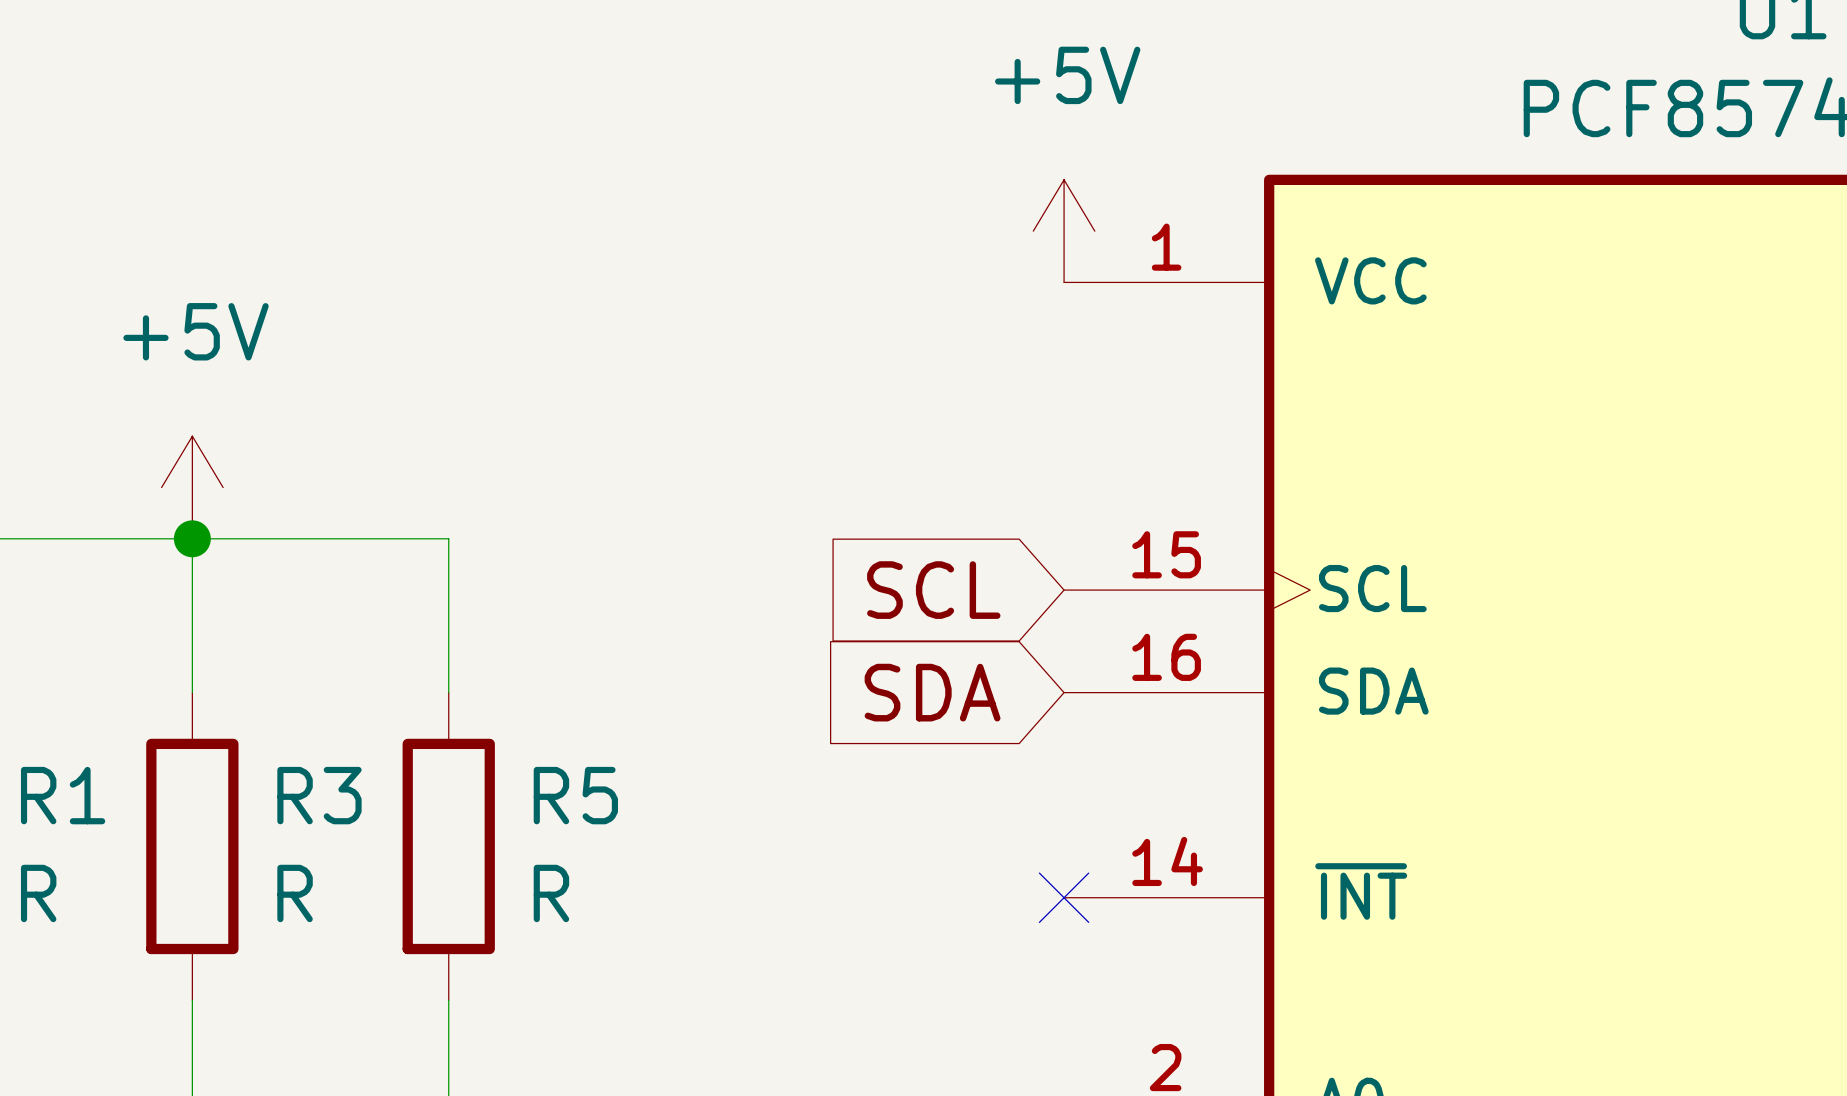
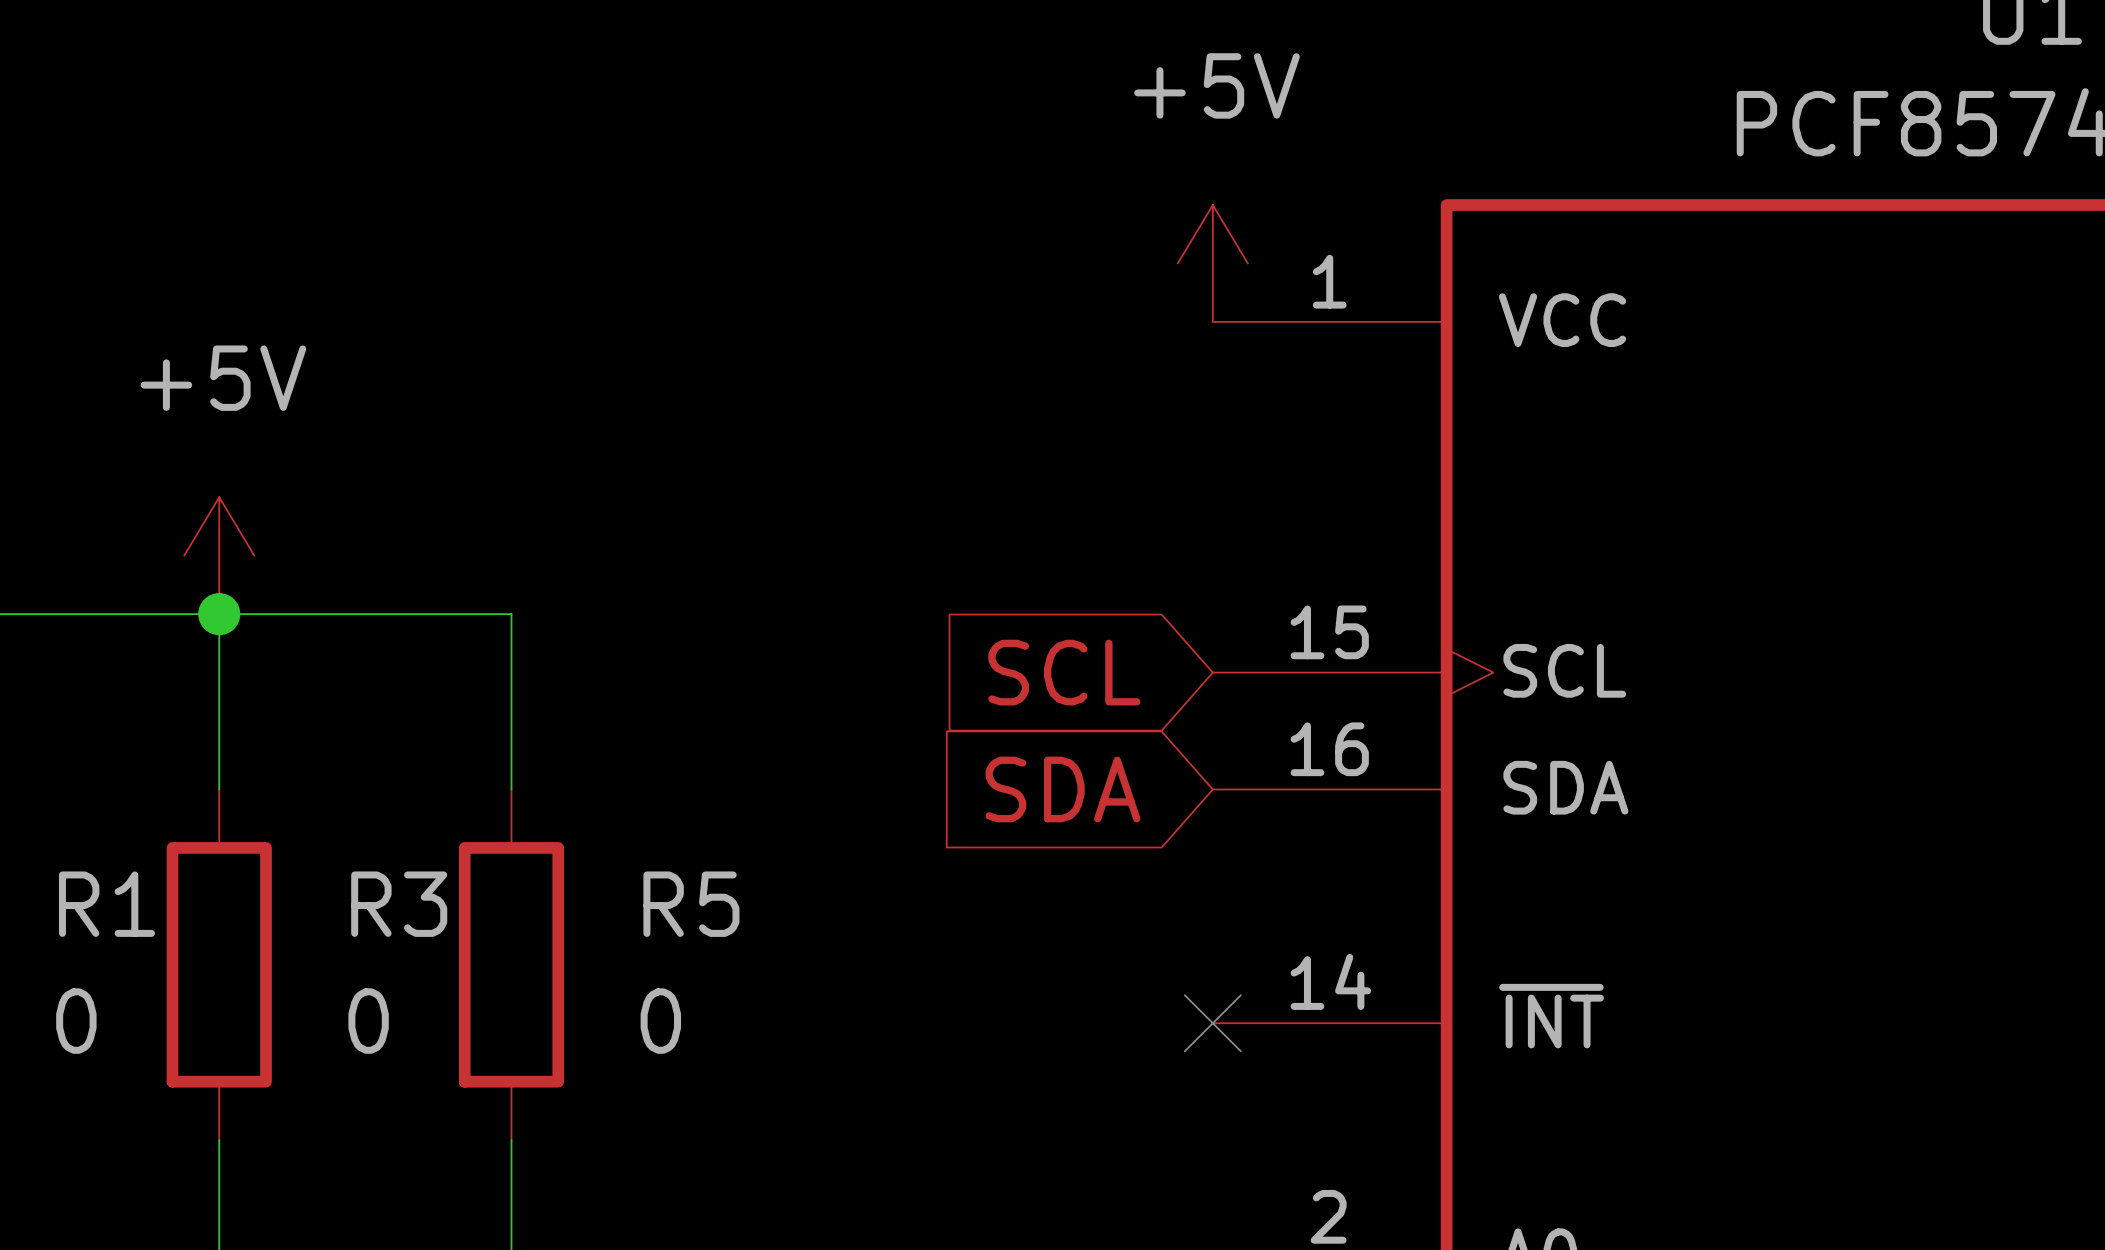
R1 name position: R1 (63, 795) -> R1 (106, 904)
R3 name position: R3 (319, 795) -> R3 (399, 904)
R5 name position: R5 (575, 795) -> R5 (691, 904)
R1 value: R (38, 893) -> 0 (76, 1021)
R3 value: R (295, 893) -> 0 (368, 1021)
R5 value: R (551, 893) -> 0 (660, 1021)

